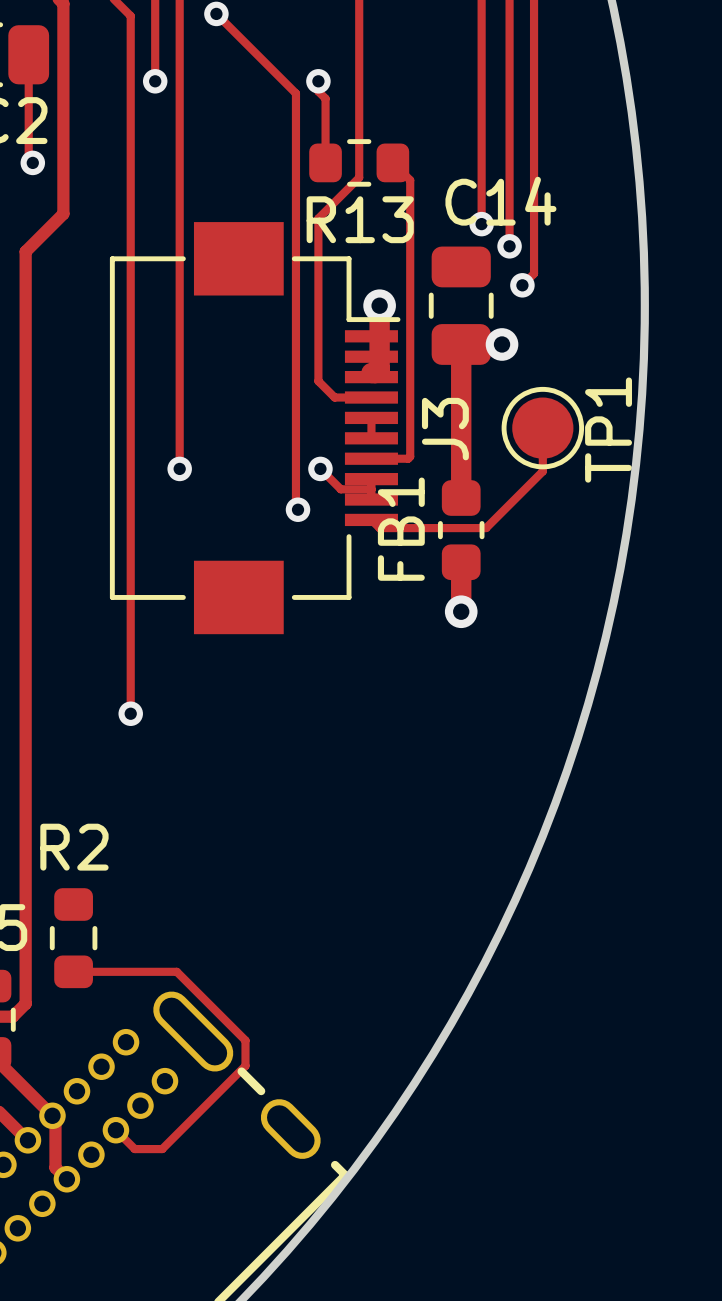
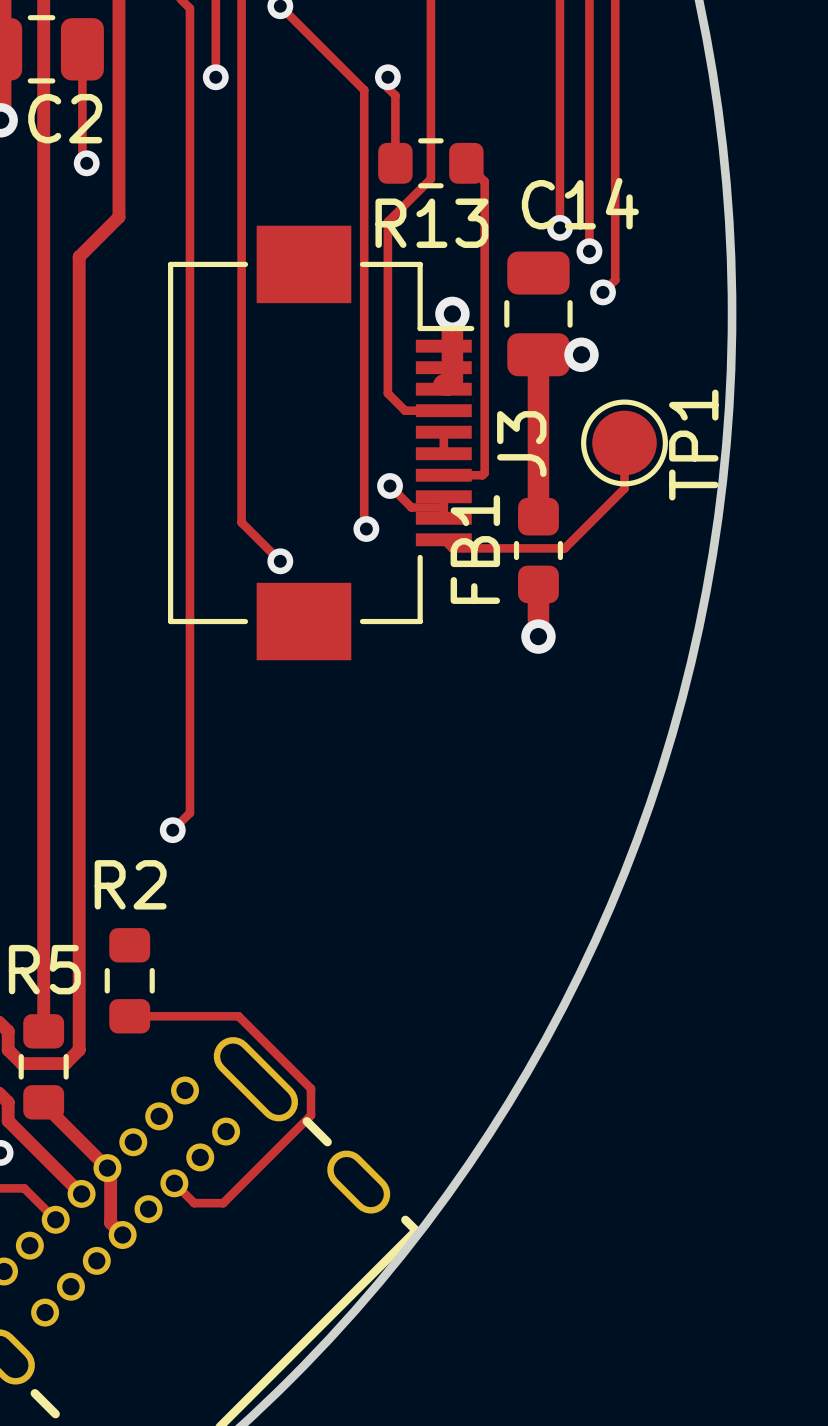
track: none -> (241, 486) (241, 522) (280, 561)
via position: (179, 468) -> (280, 561)
track: none -> (189, 744) (189, 812) (172, 830)
via position: (130, 713) -> (172, 830)

